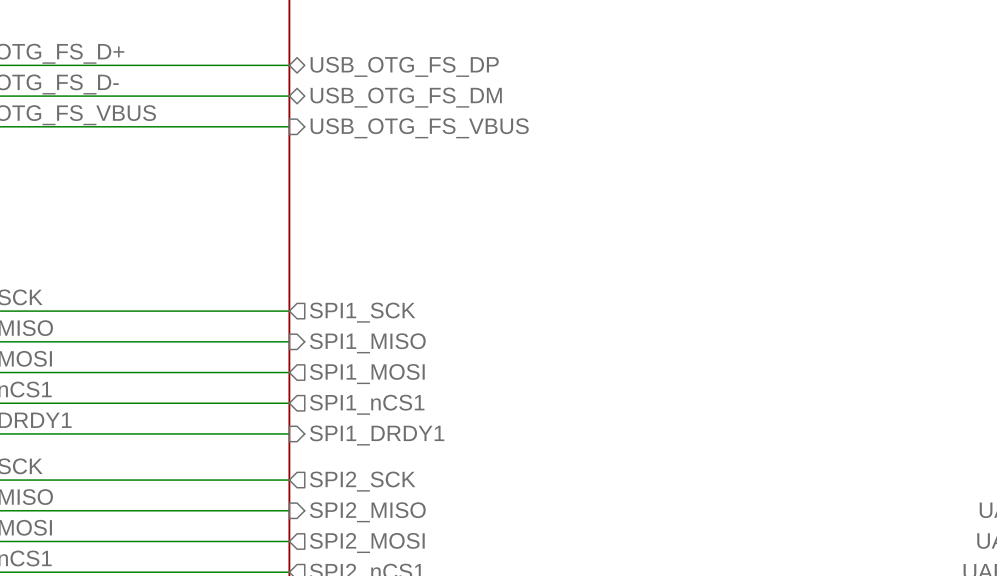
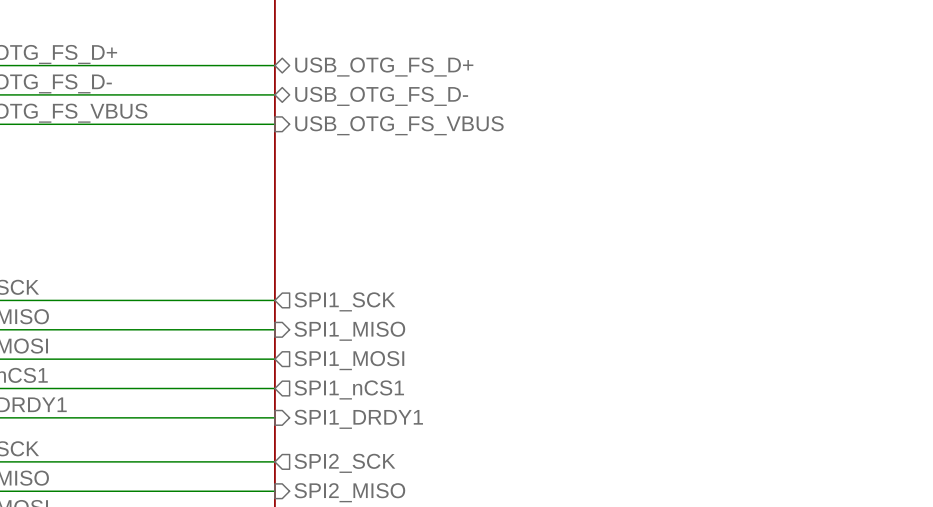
sheet pin: USB_OTG_FS_DP (404, 66) -> USB_OTG_FS_D+ (384, 67)
sheet pin: USB_OTG_FS_DM (406, 97) -> USB_OTG_FS_D- (381, 96)

